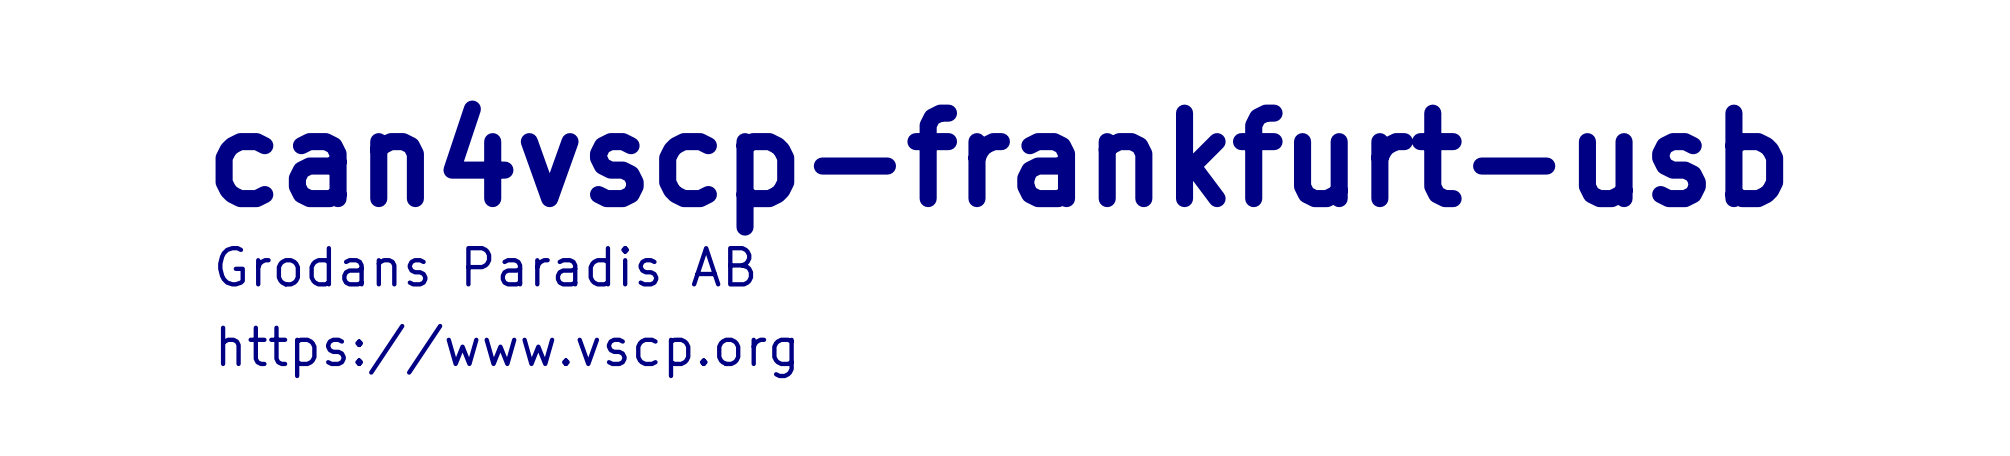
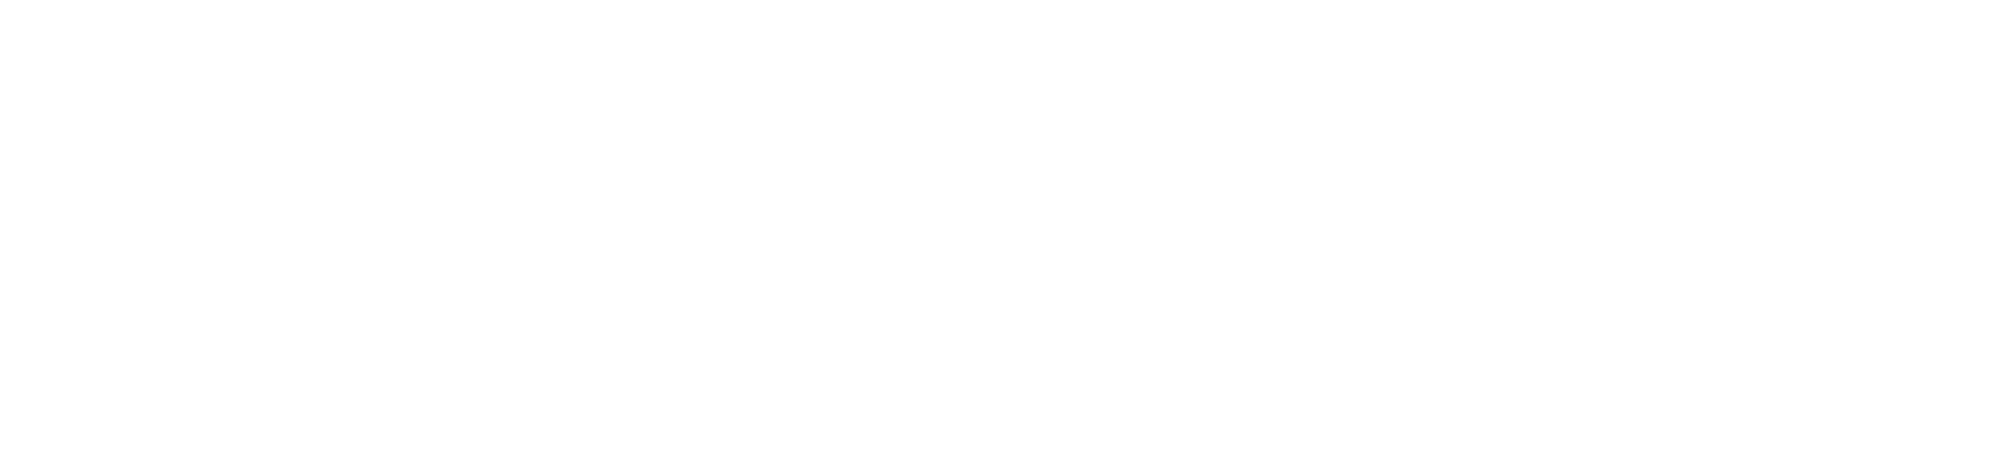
text: can4vscp-frankfurt-usb (999, 168) -> none
text: Grodans Paradis AB (485, 266) -> none
text: https://www.vscp.org (507, 351) -> none

